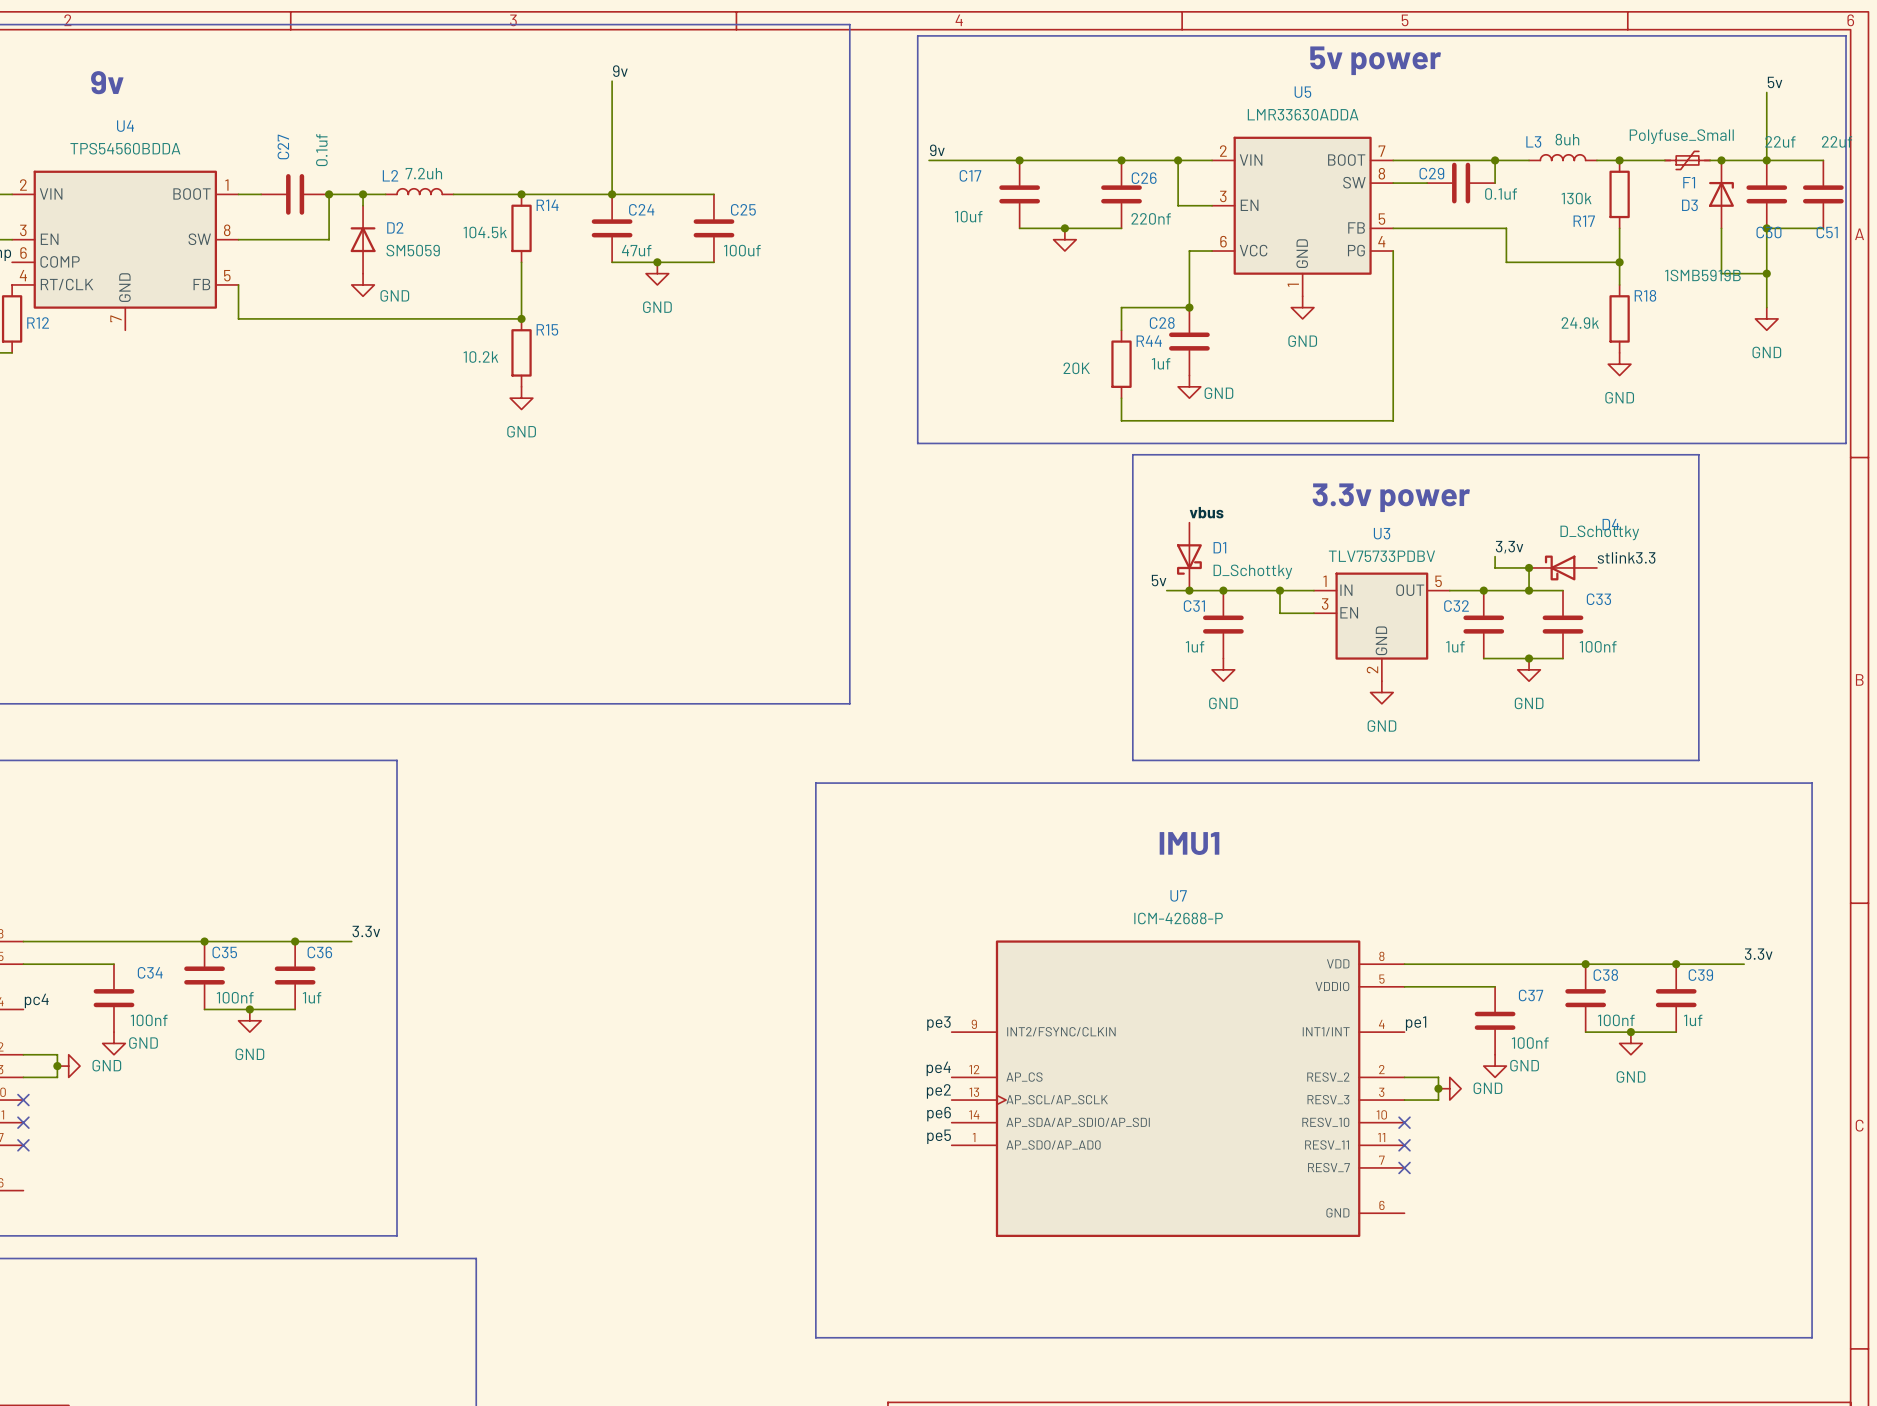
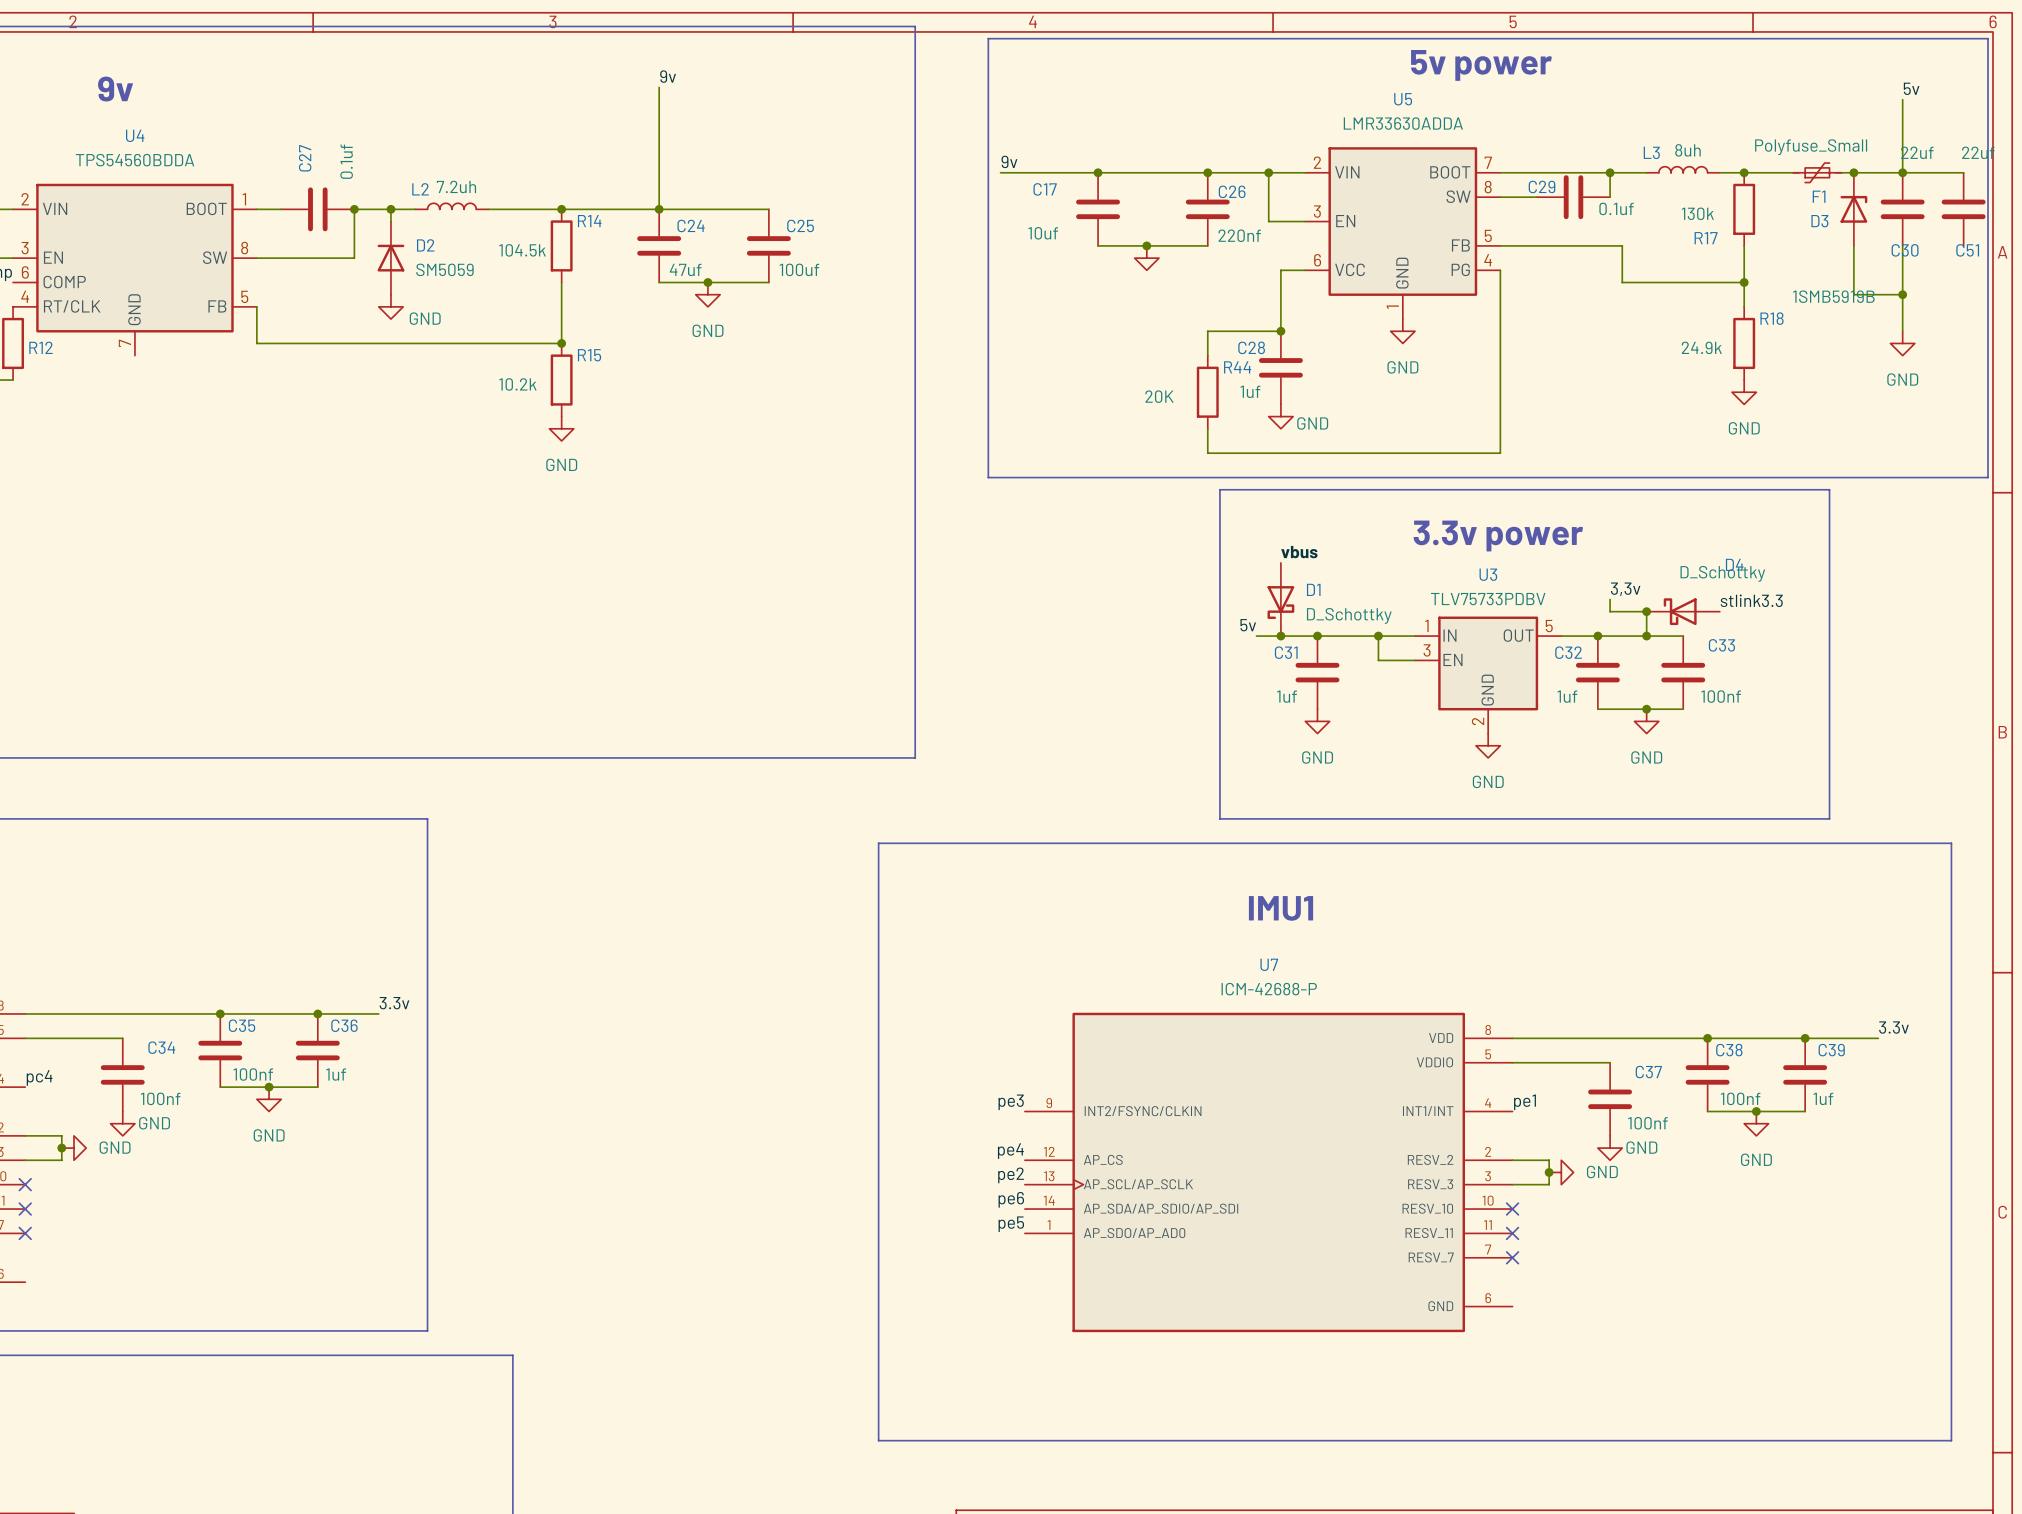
wire: (1766, 228) (1823, 228) -> none
junction: (1766, 228) -> none

